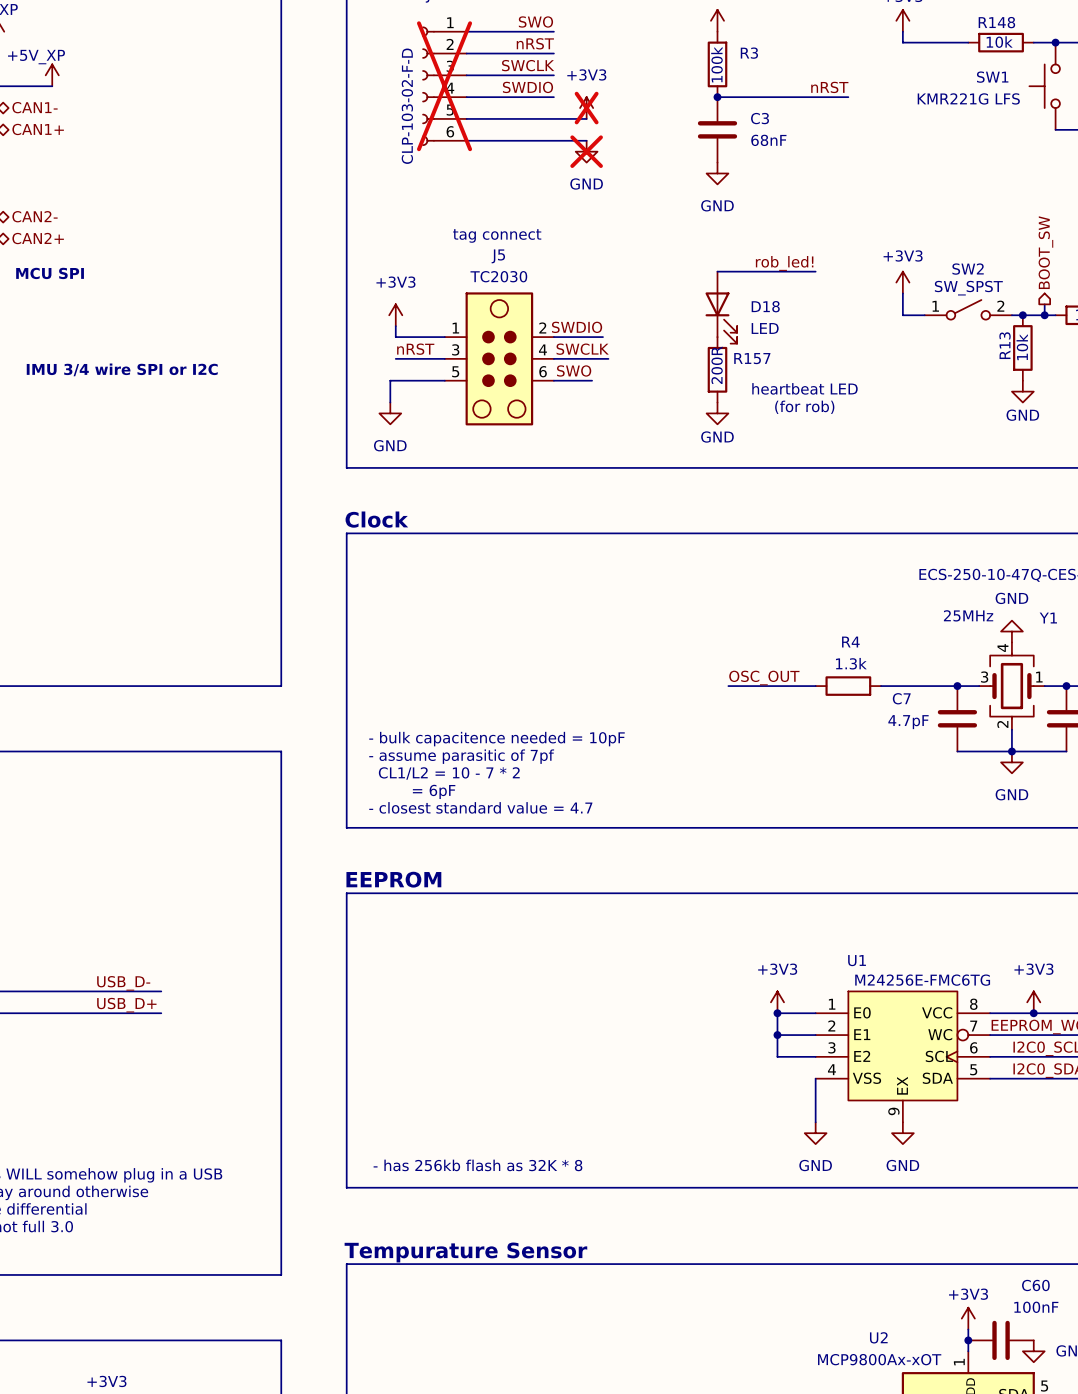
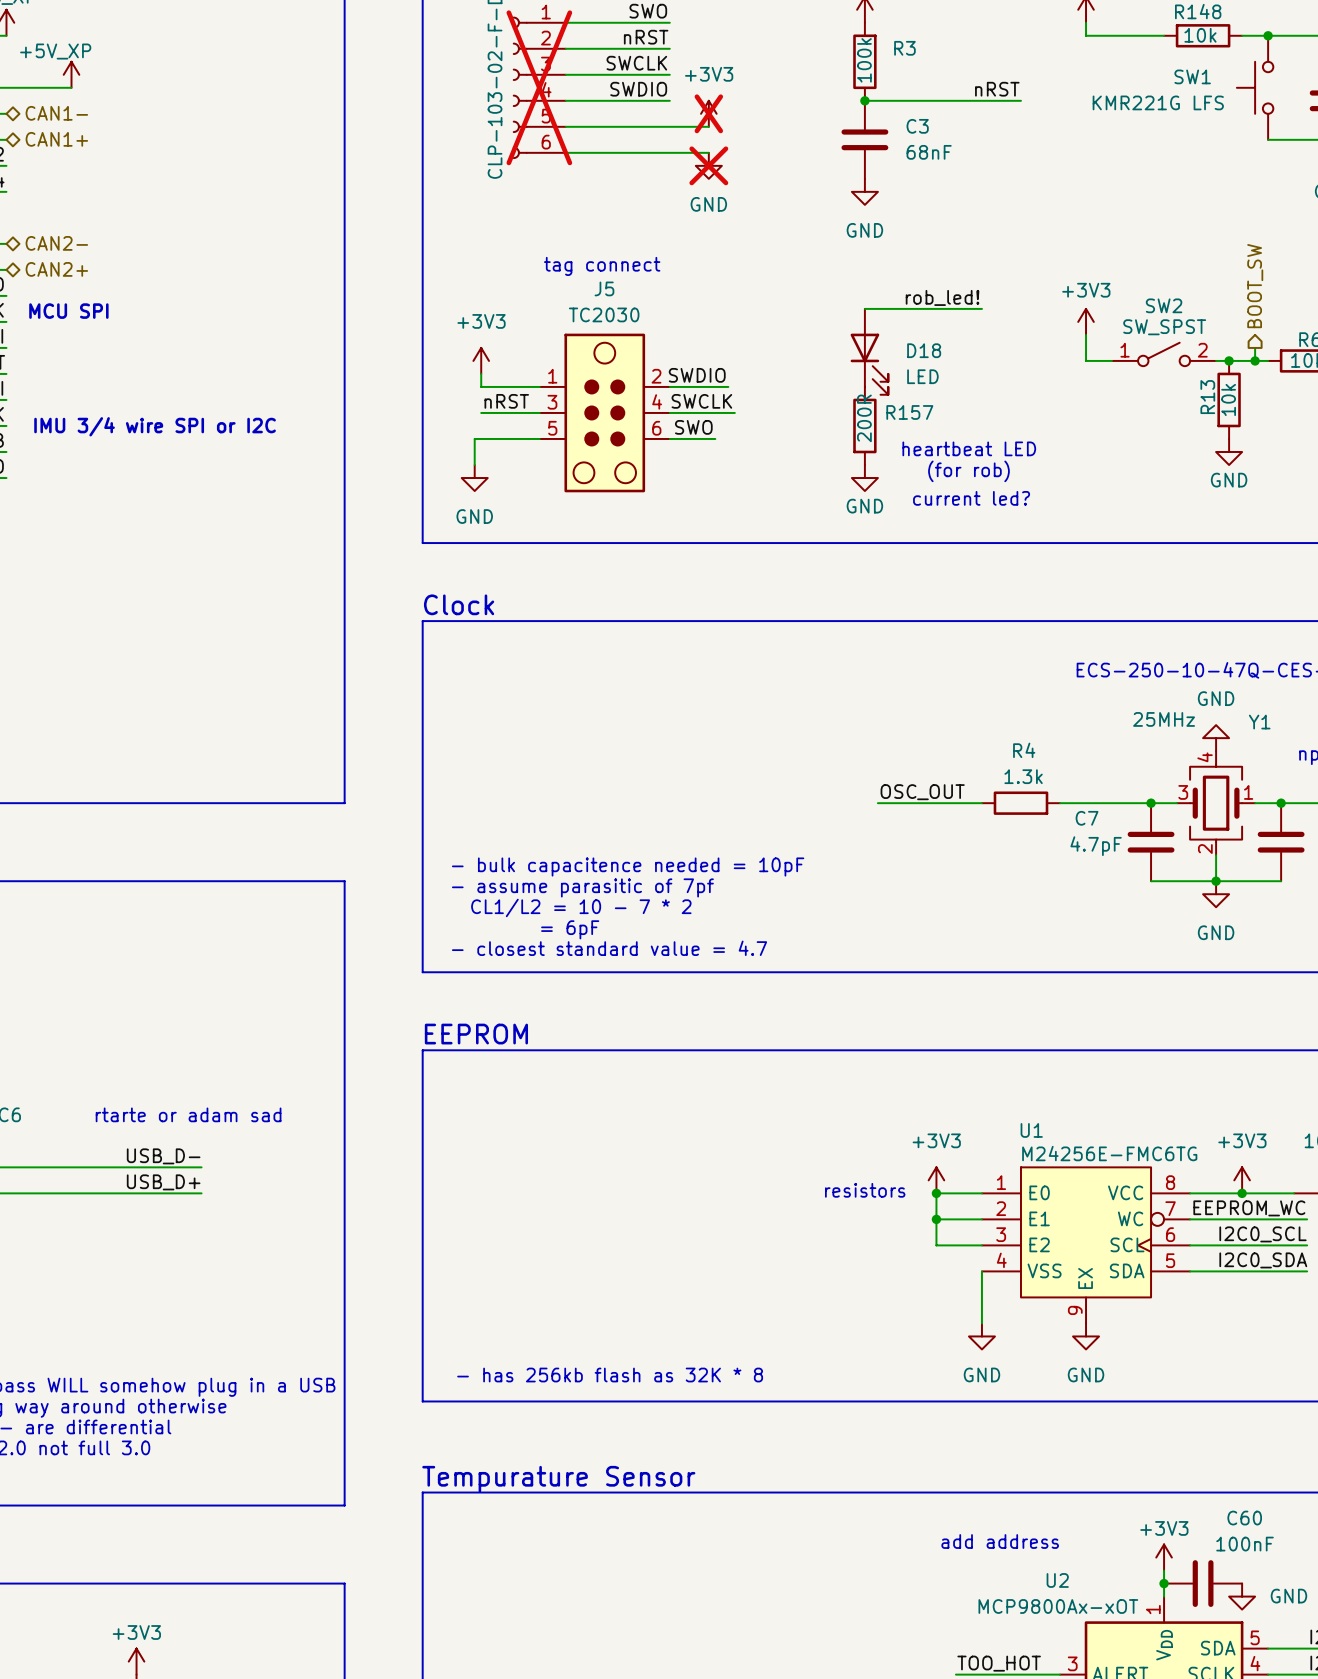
text: none -> current led? (971, 498)
text: none -> rtarte or adam sad (188, 1114)
text: none -> resistors (865, 1190)
text: none -> add address (1000, 1541)

